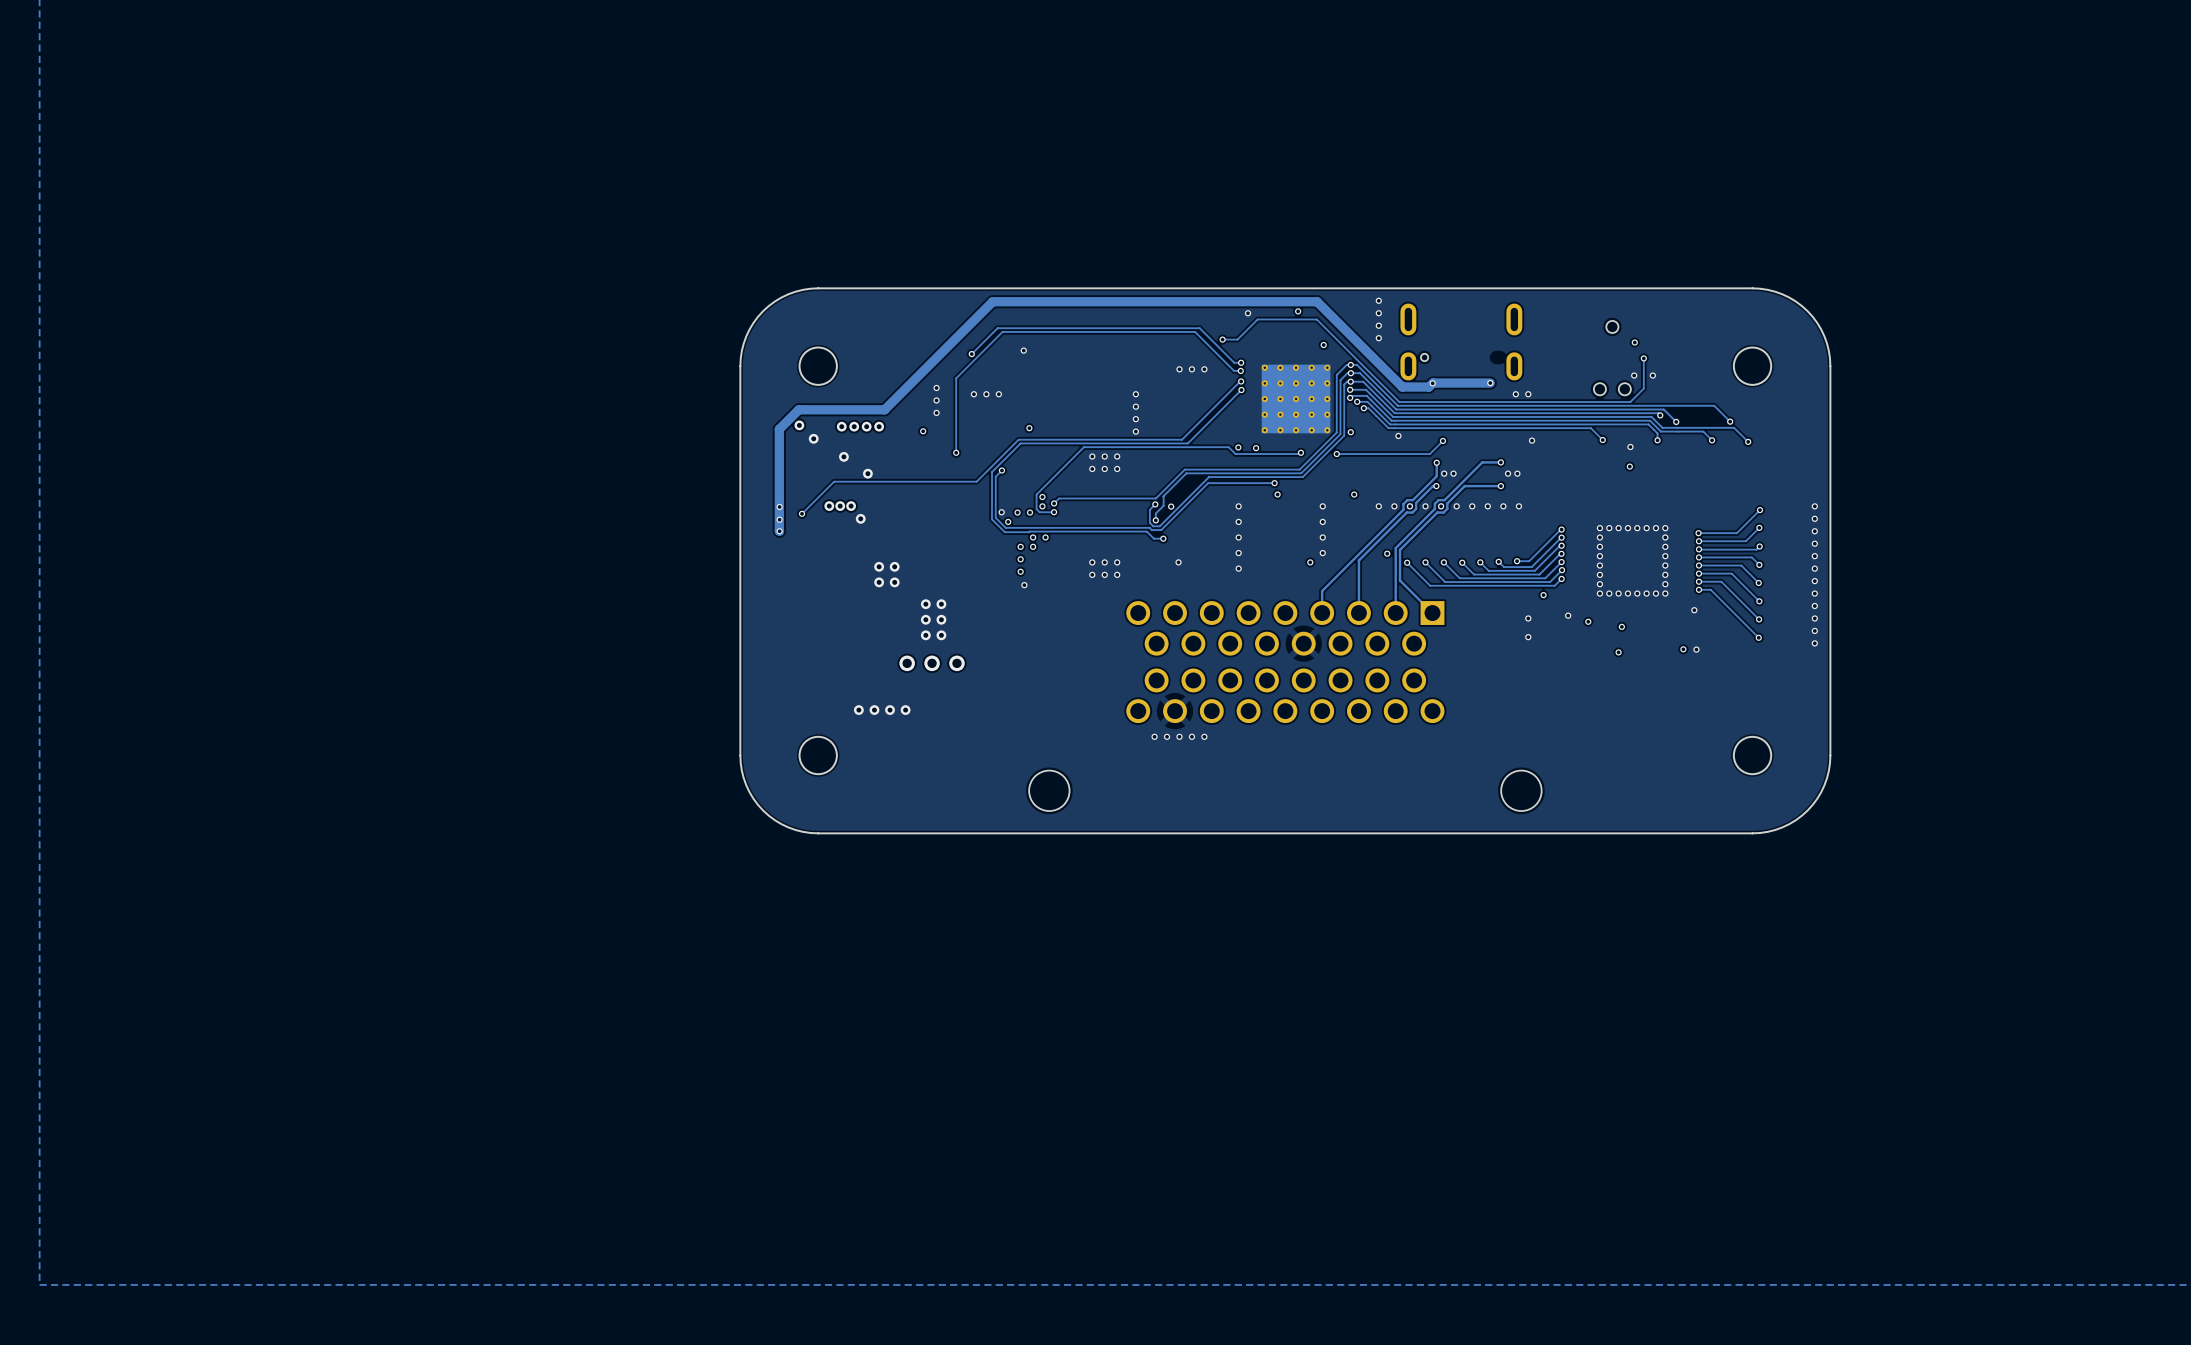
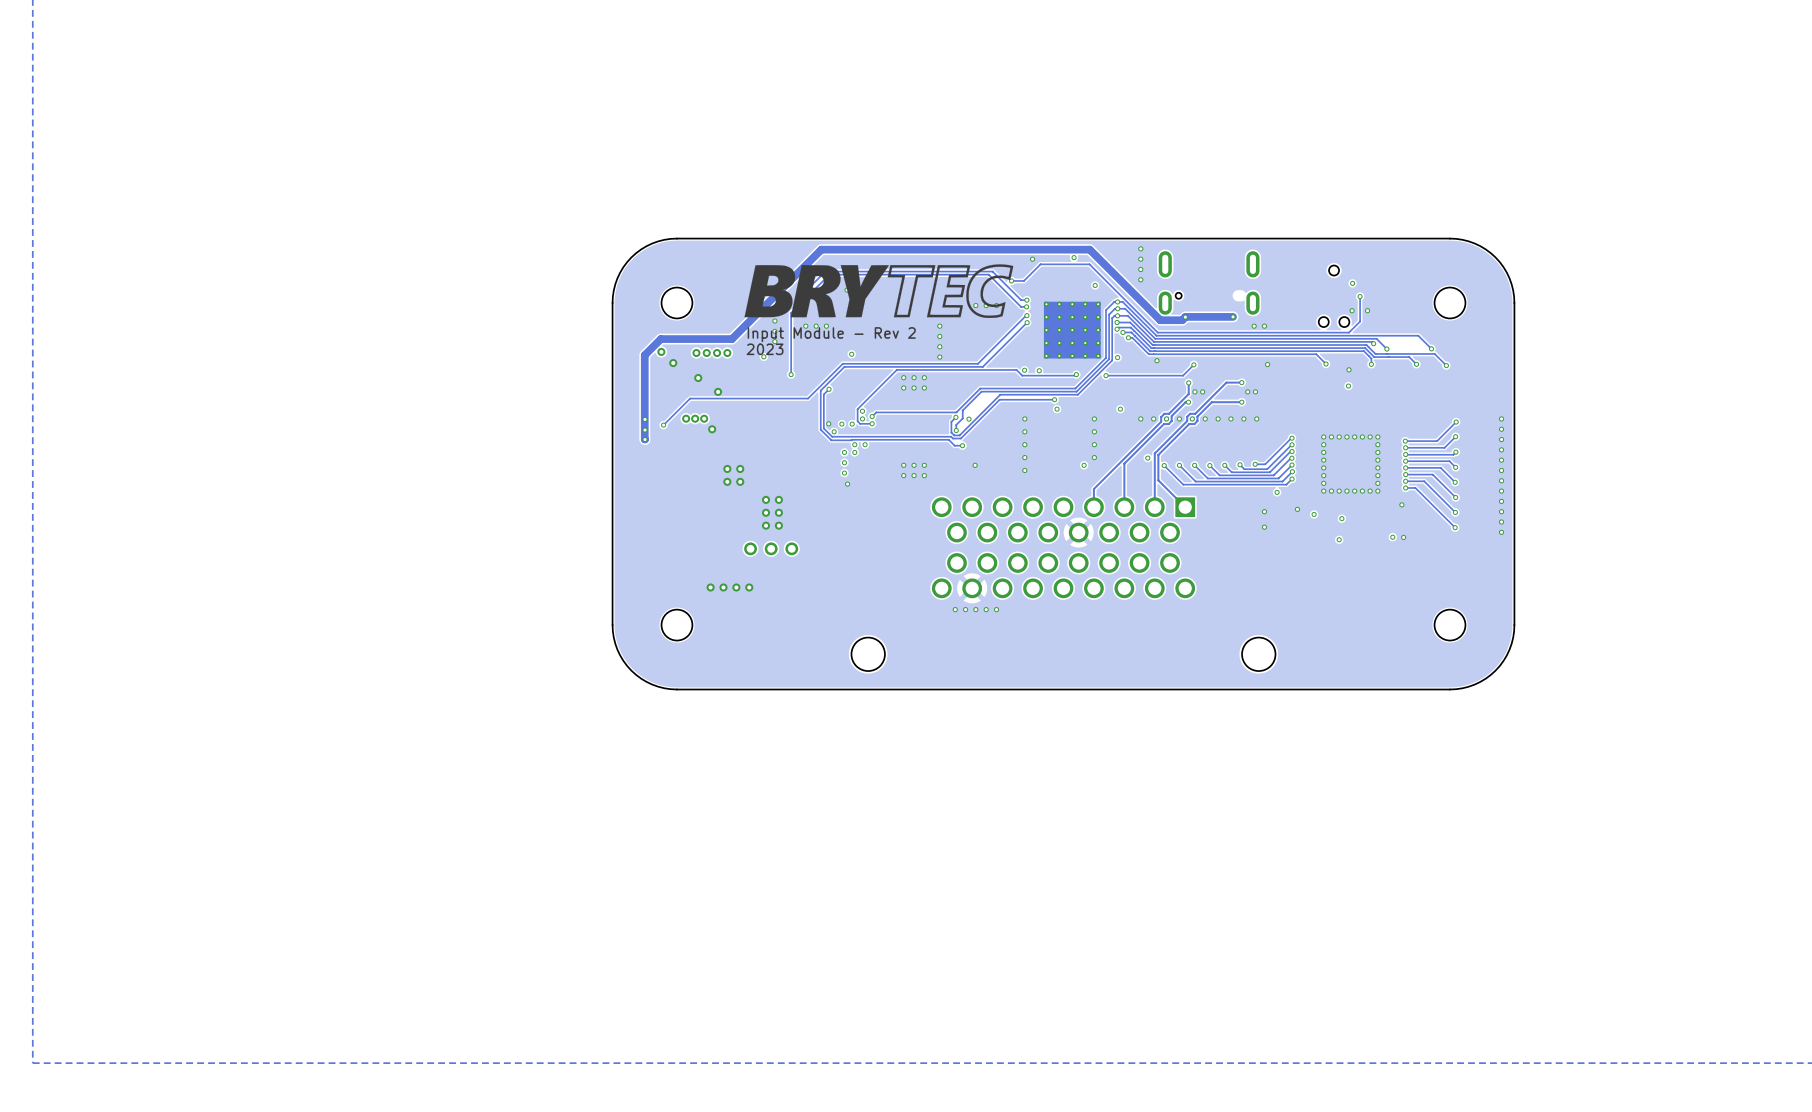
drawing: none -> [744, 264, 1014, 318]
text: none -> Input Module - Rev 2 (831, 334)
text: none -> 2023 (765, 349)

